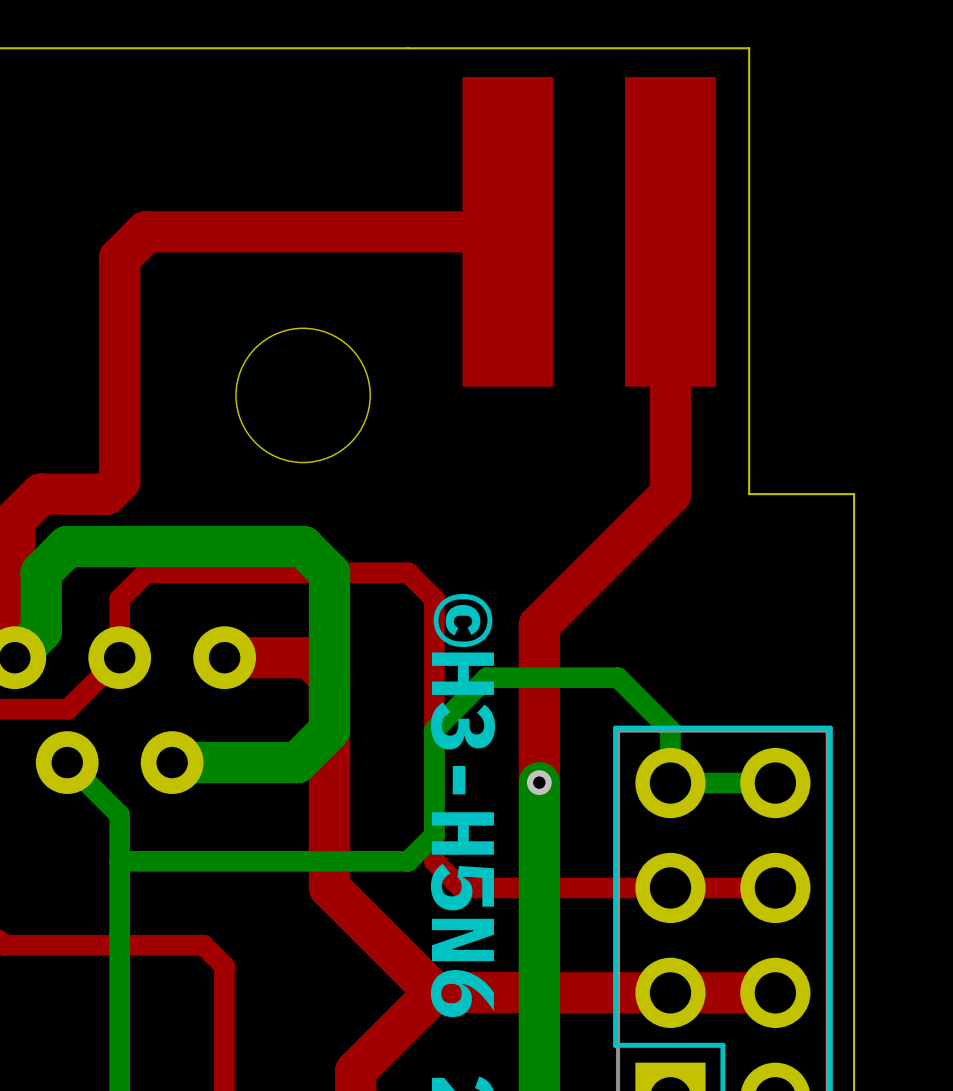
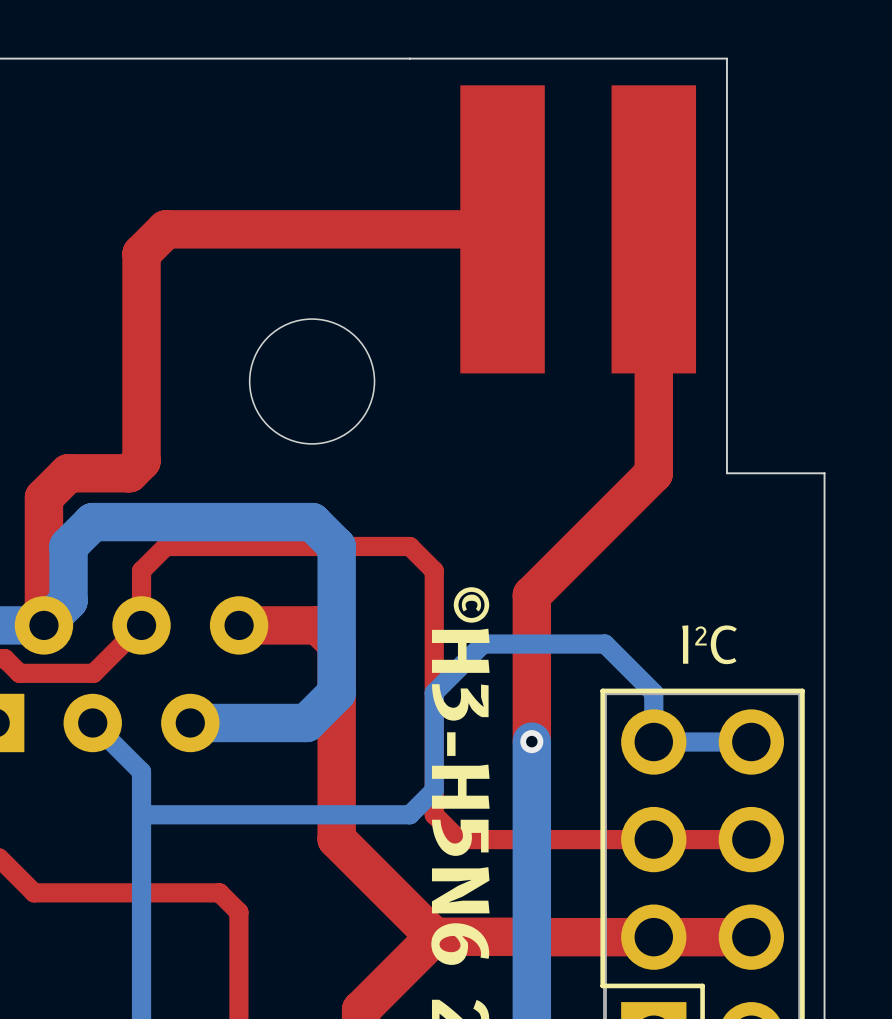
text: none -> I²C (709, 644)

